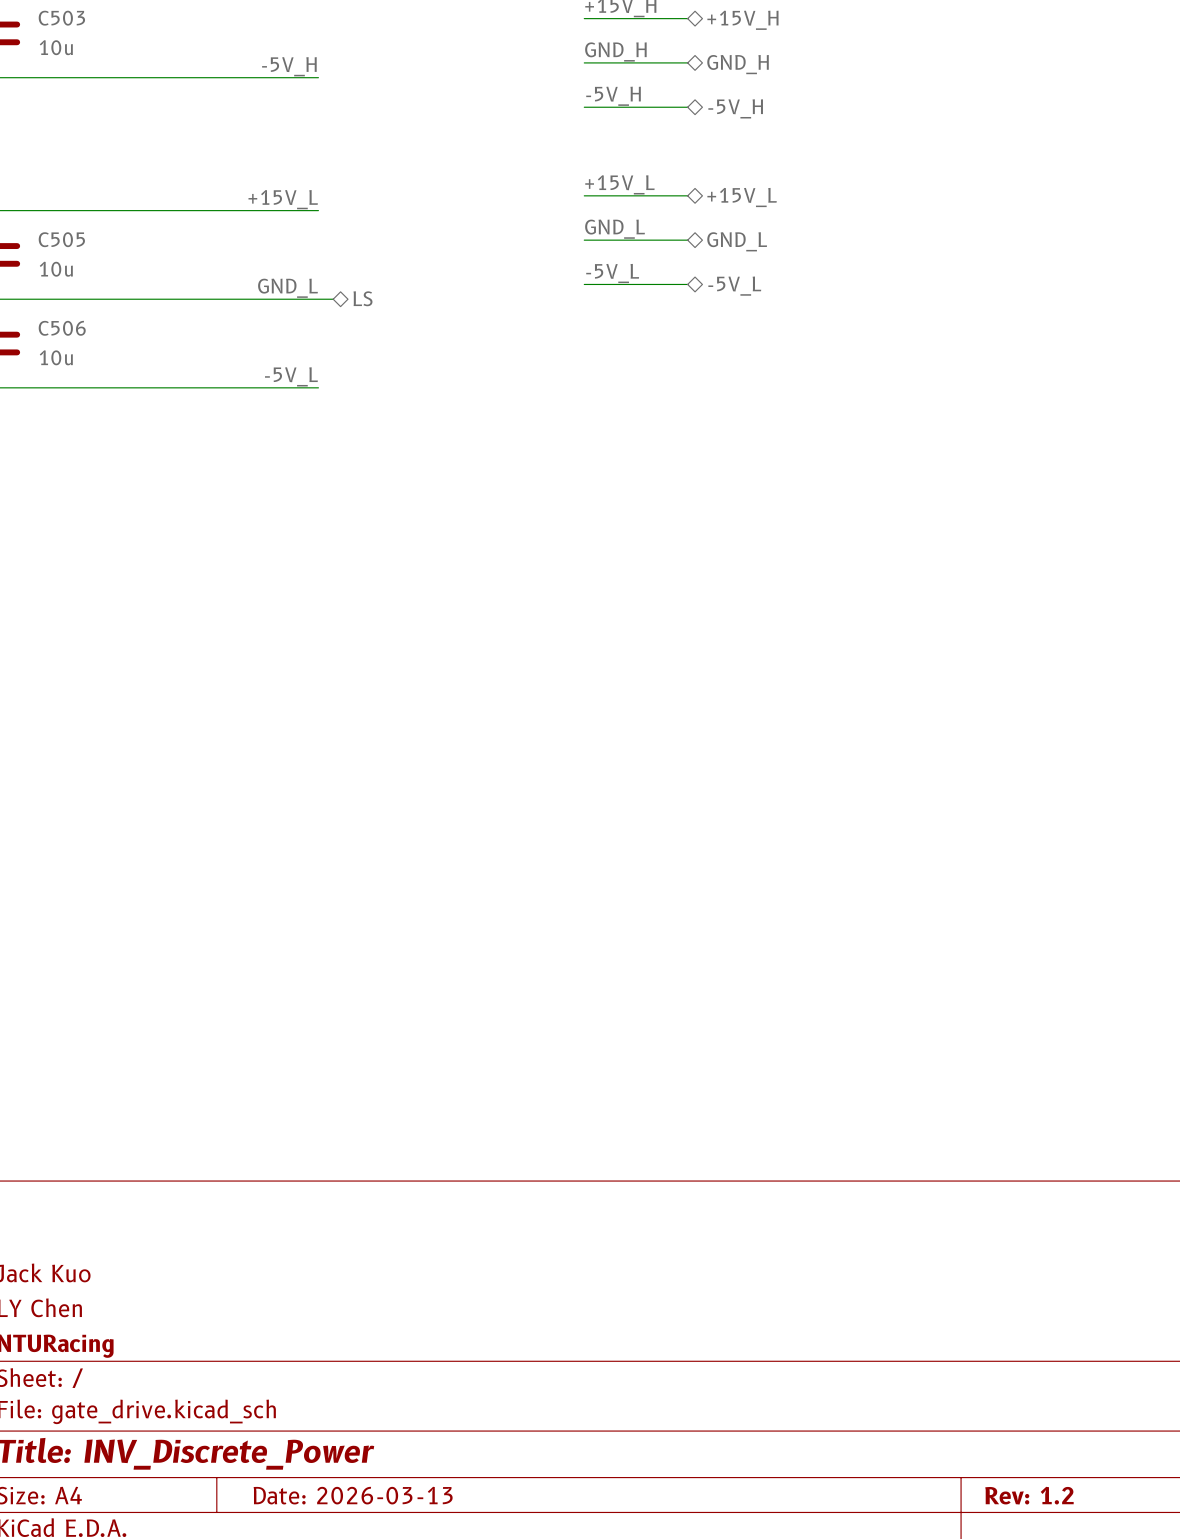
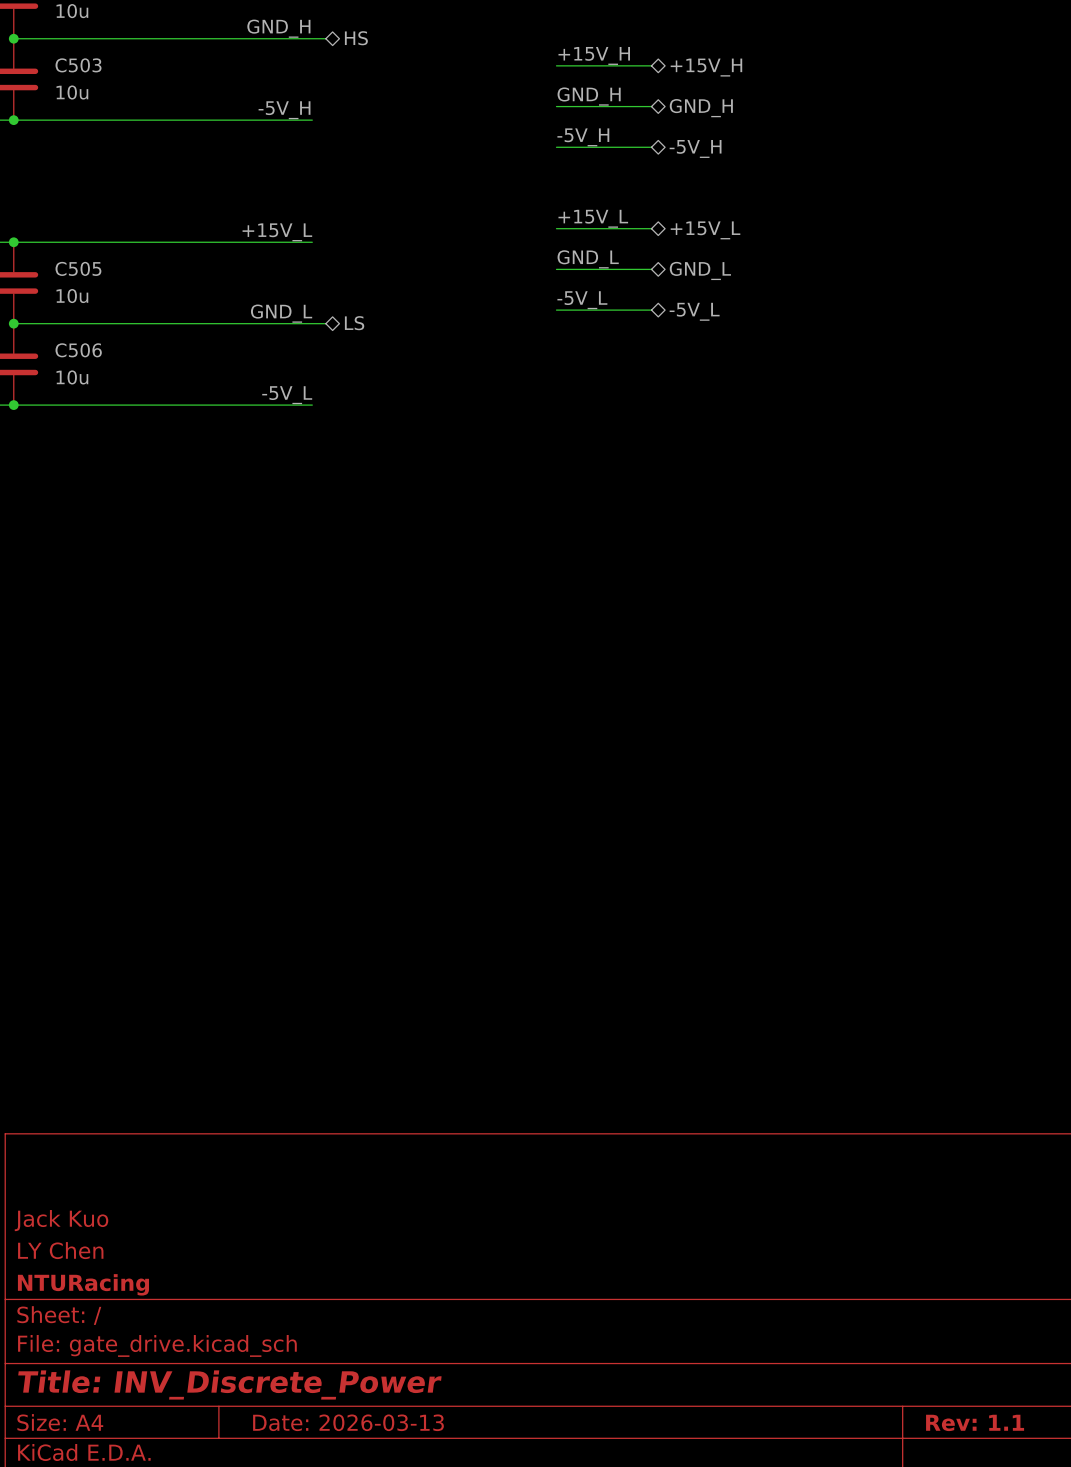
title block: Rev: 1.2 (1029, 1495) -> Rev: 1.1 (975, 1422)

